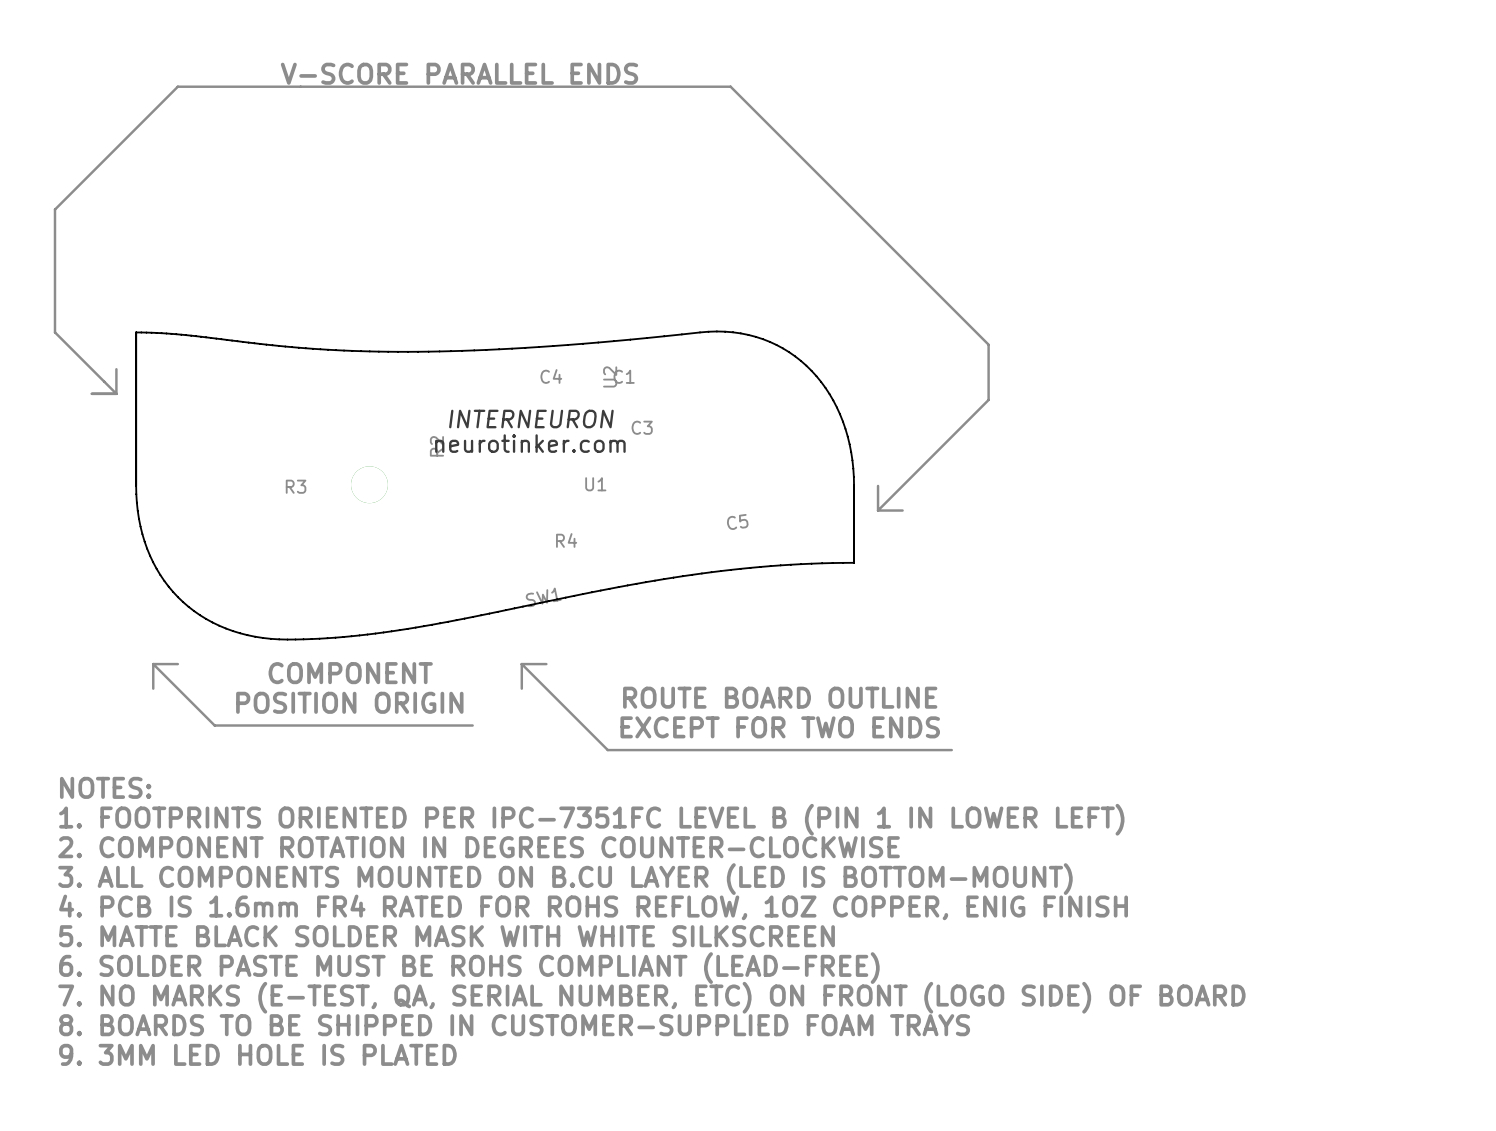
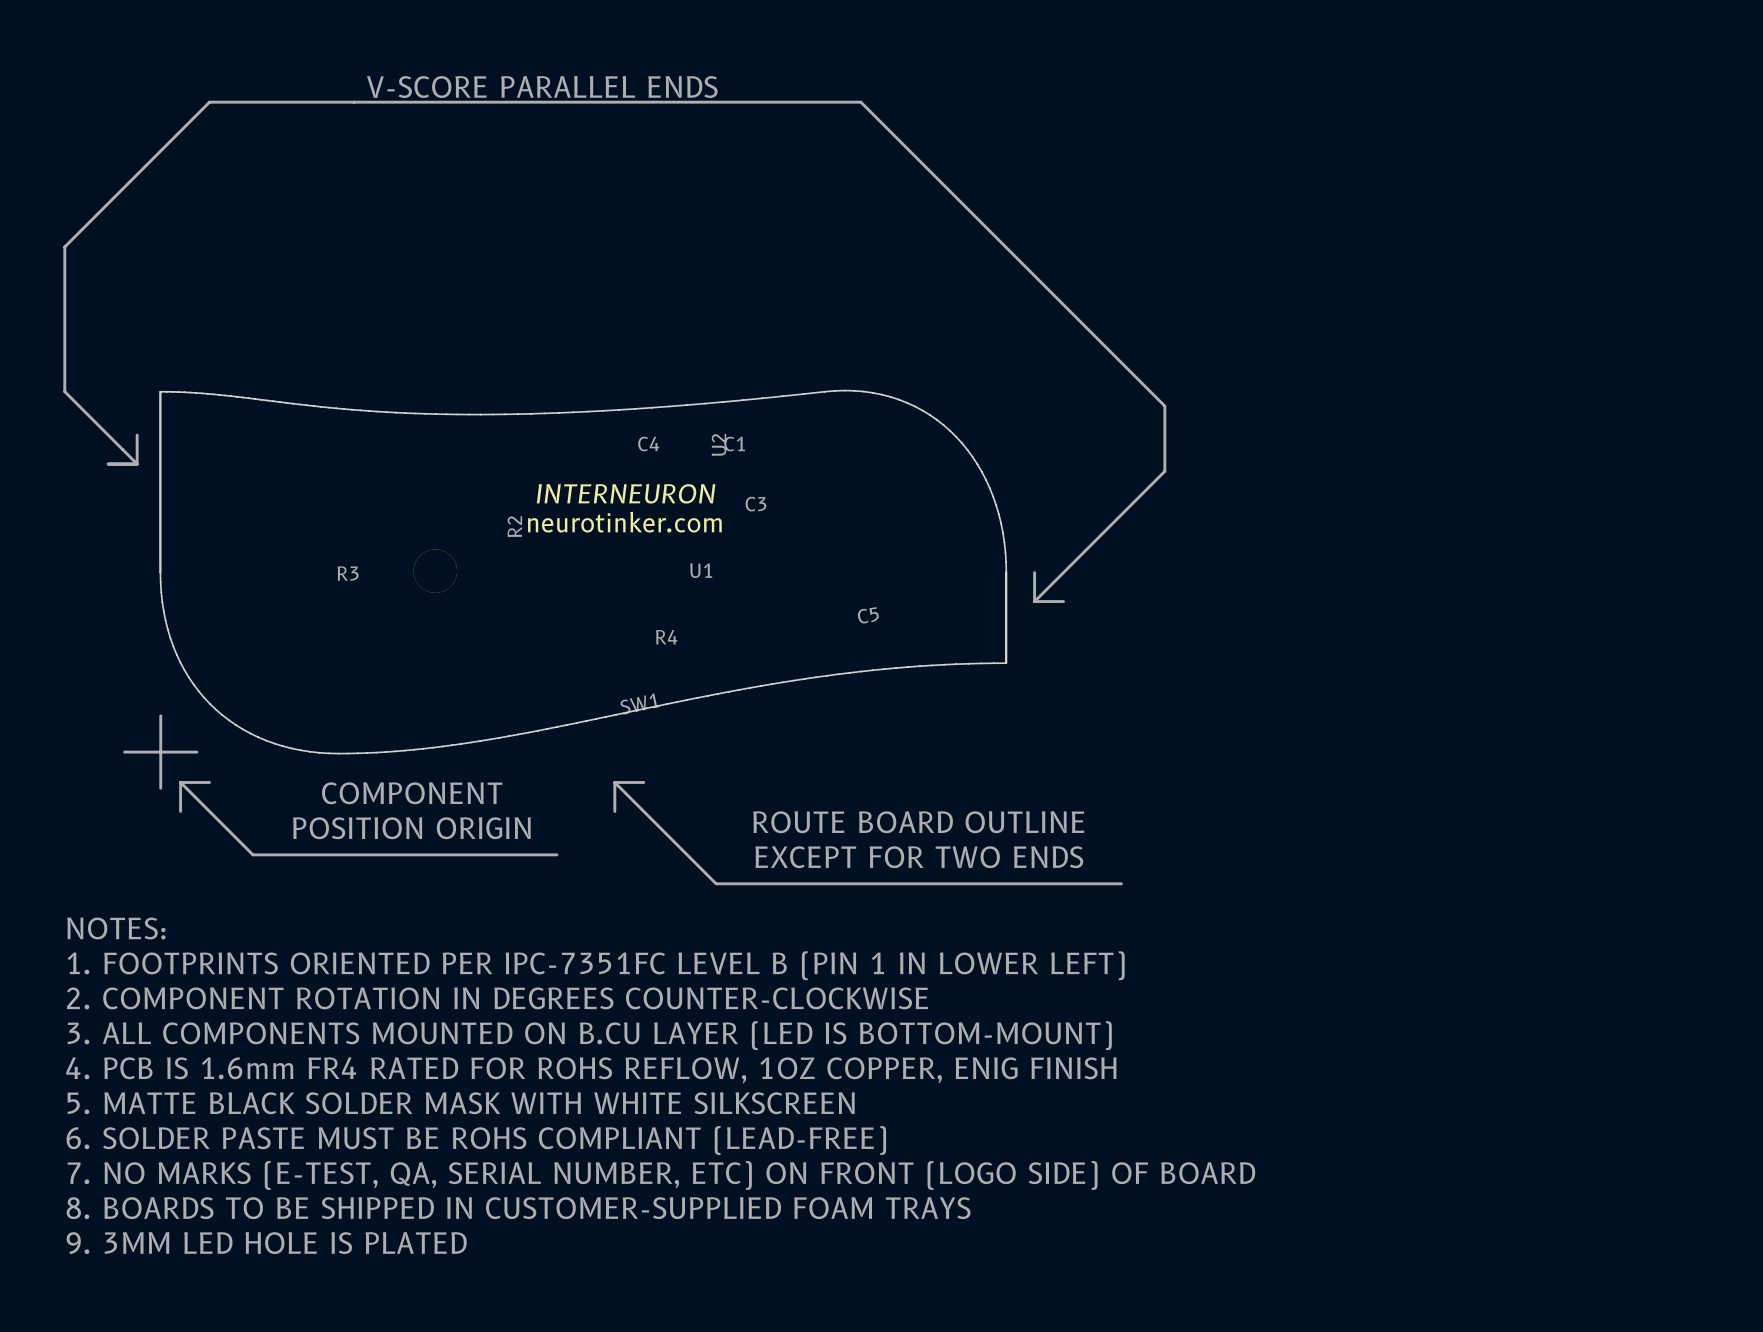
line: none -> (160, 715) (160, 788)
line: none -> (124, 752) (196, 752)

